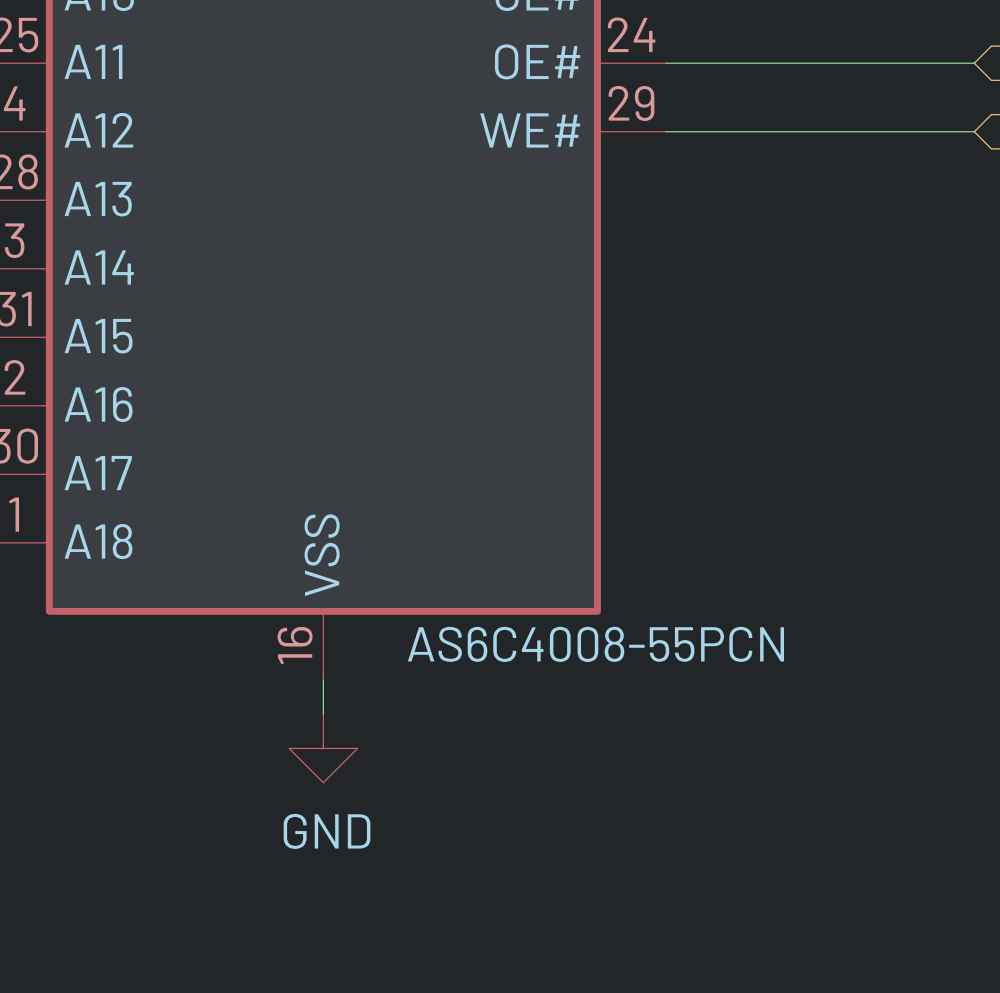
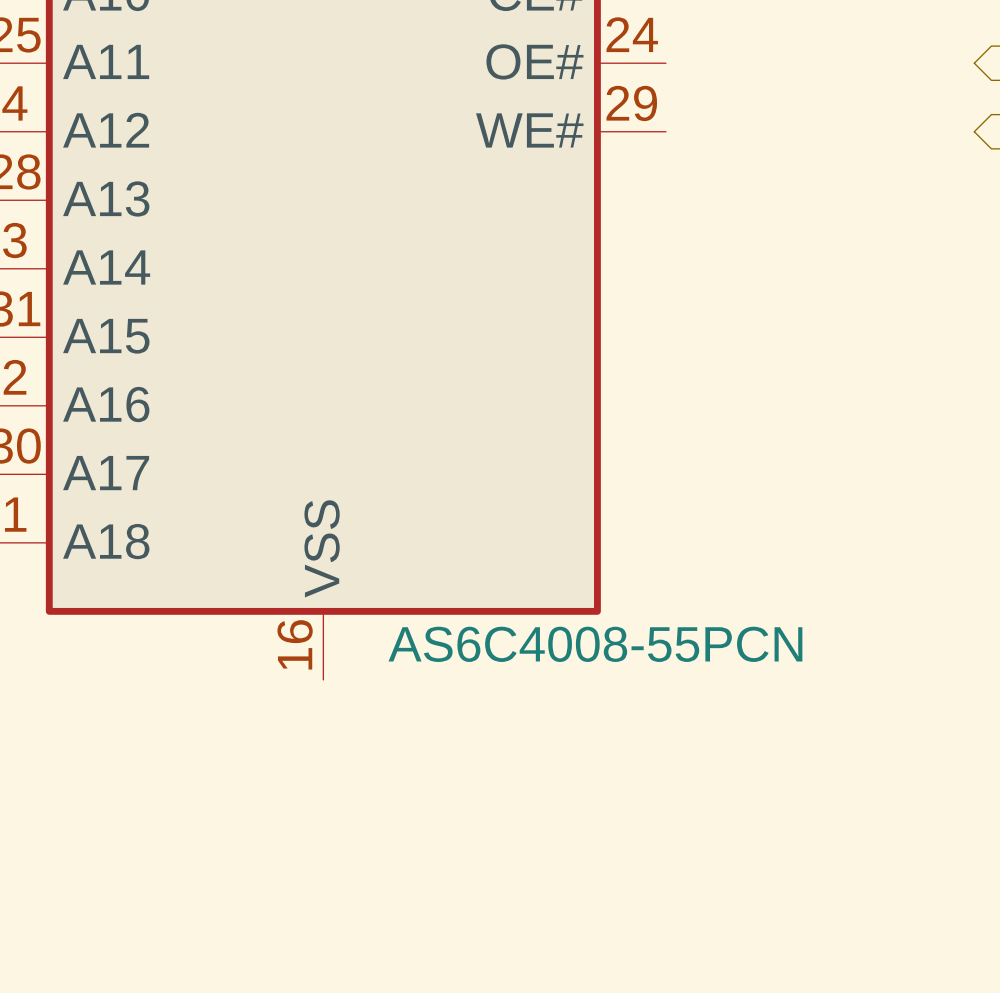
wire: (665, 63) (974, 63) -> none
wire: (665, 131) (974, 131) -> none
wire: (323, 679) (323, 714) -> none
power symbol: GND (323, 748) -> none

